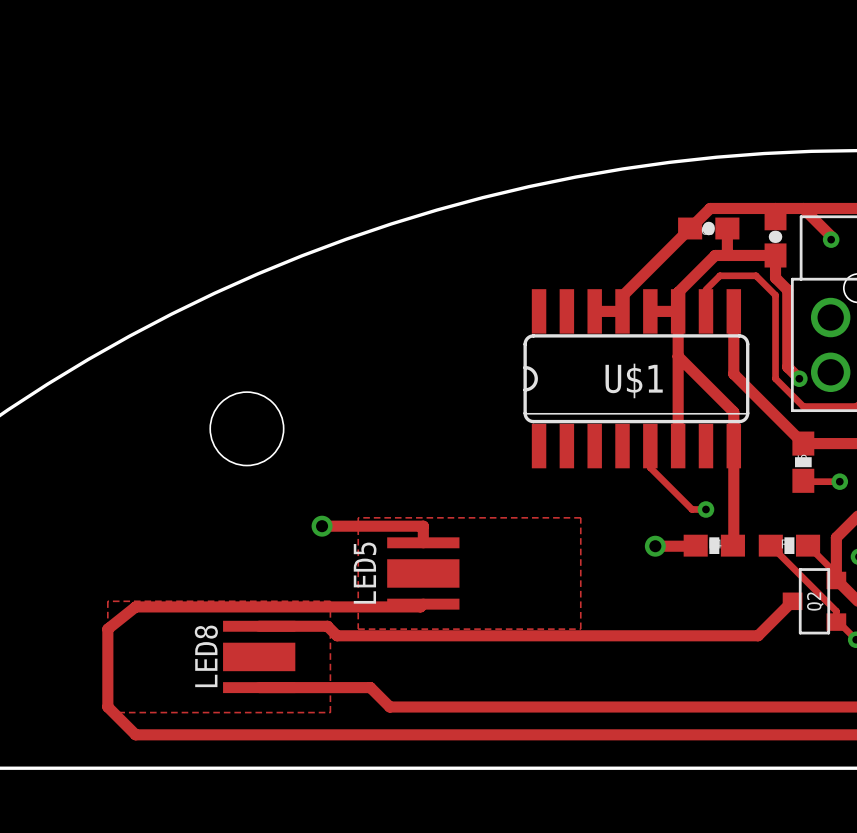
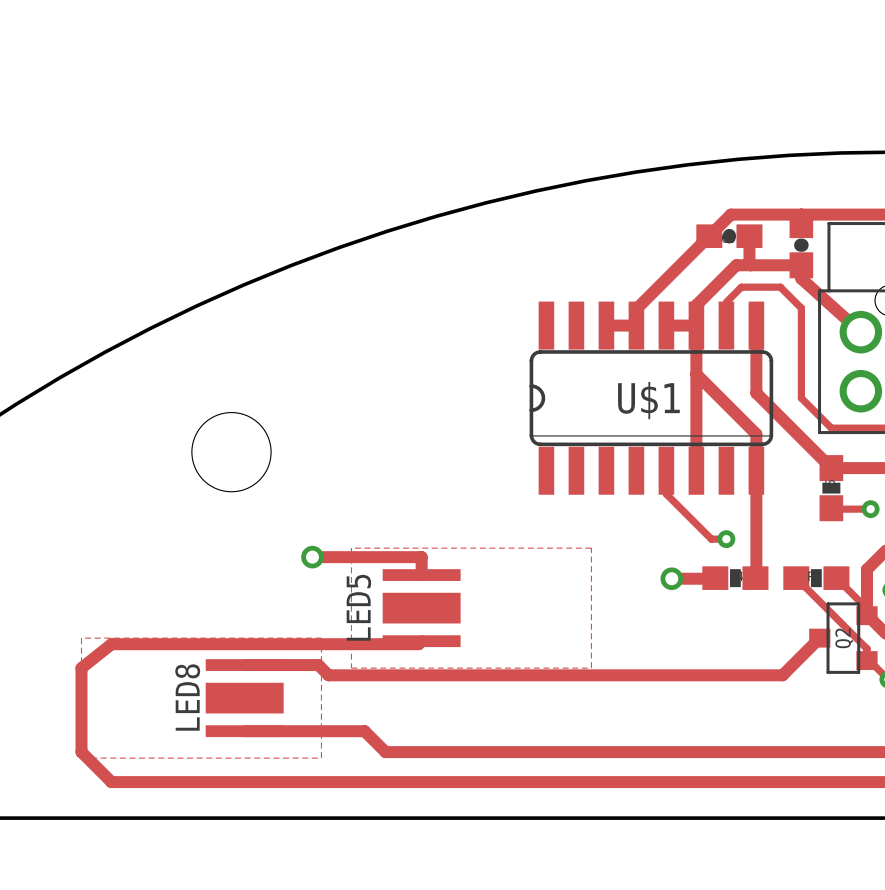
track: (803, 208) (831, 236) (831, 239) -> none
via: (831, 239) -> none
track: (775, 267) (775, 277) (787, 290) (787, 367) (799, 378) -> (801, 278) (860, 332)
via: (799, 378) -> none

